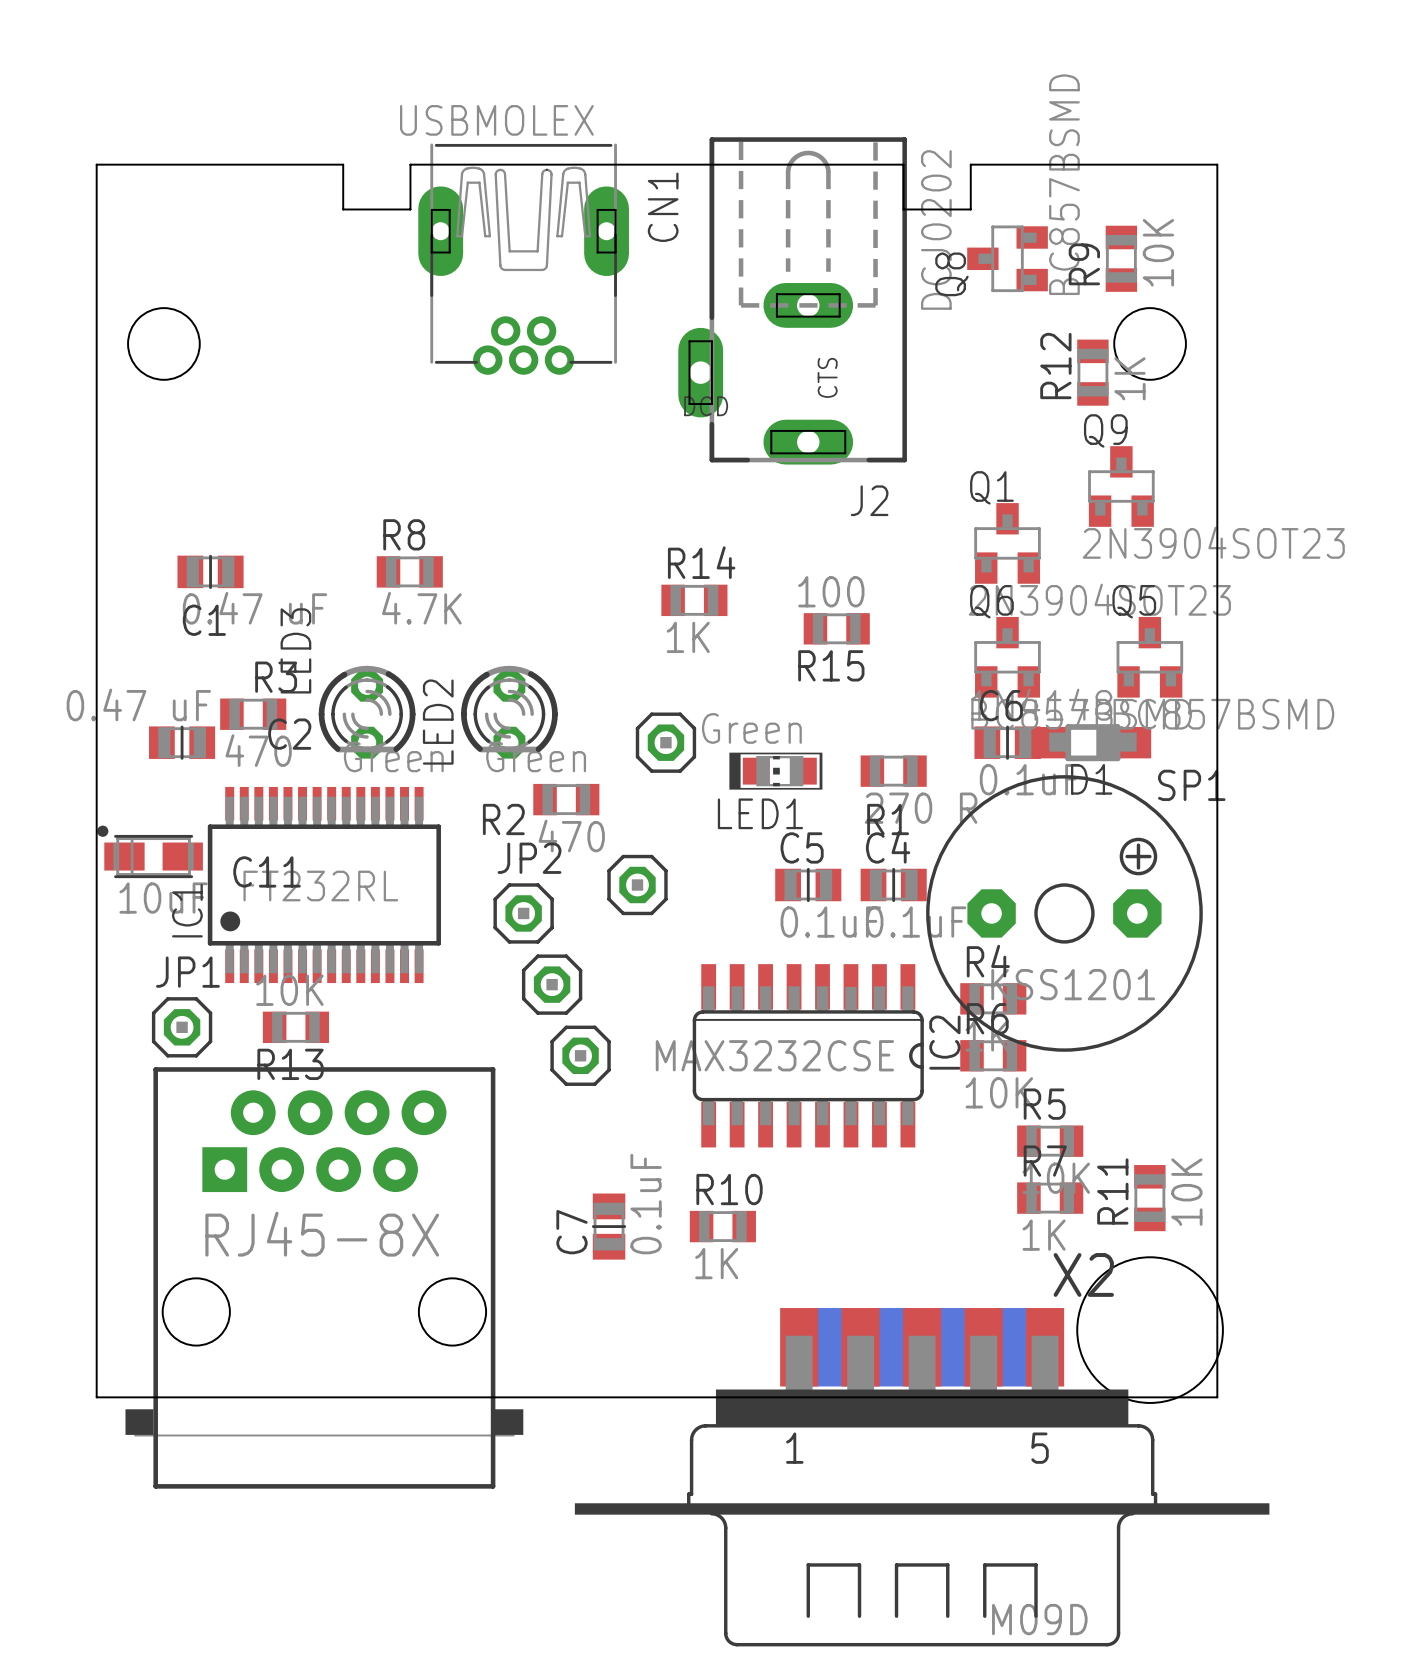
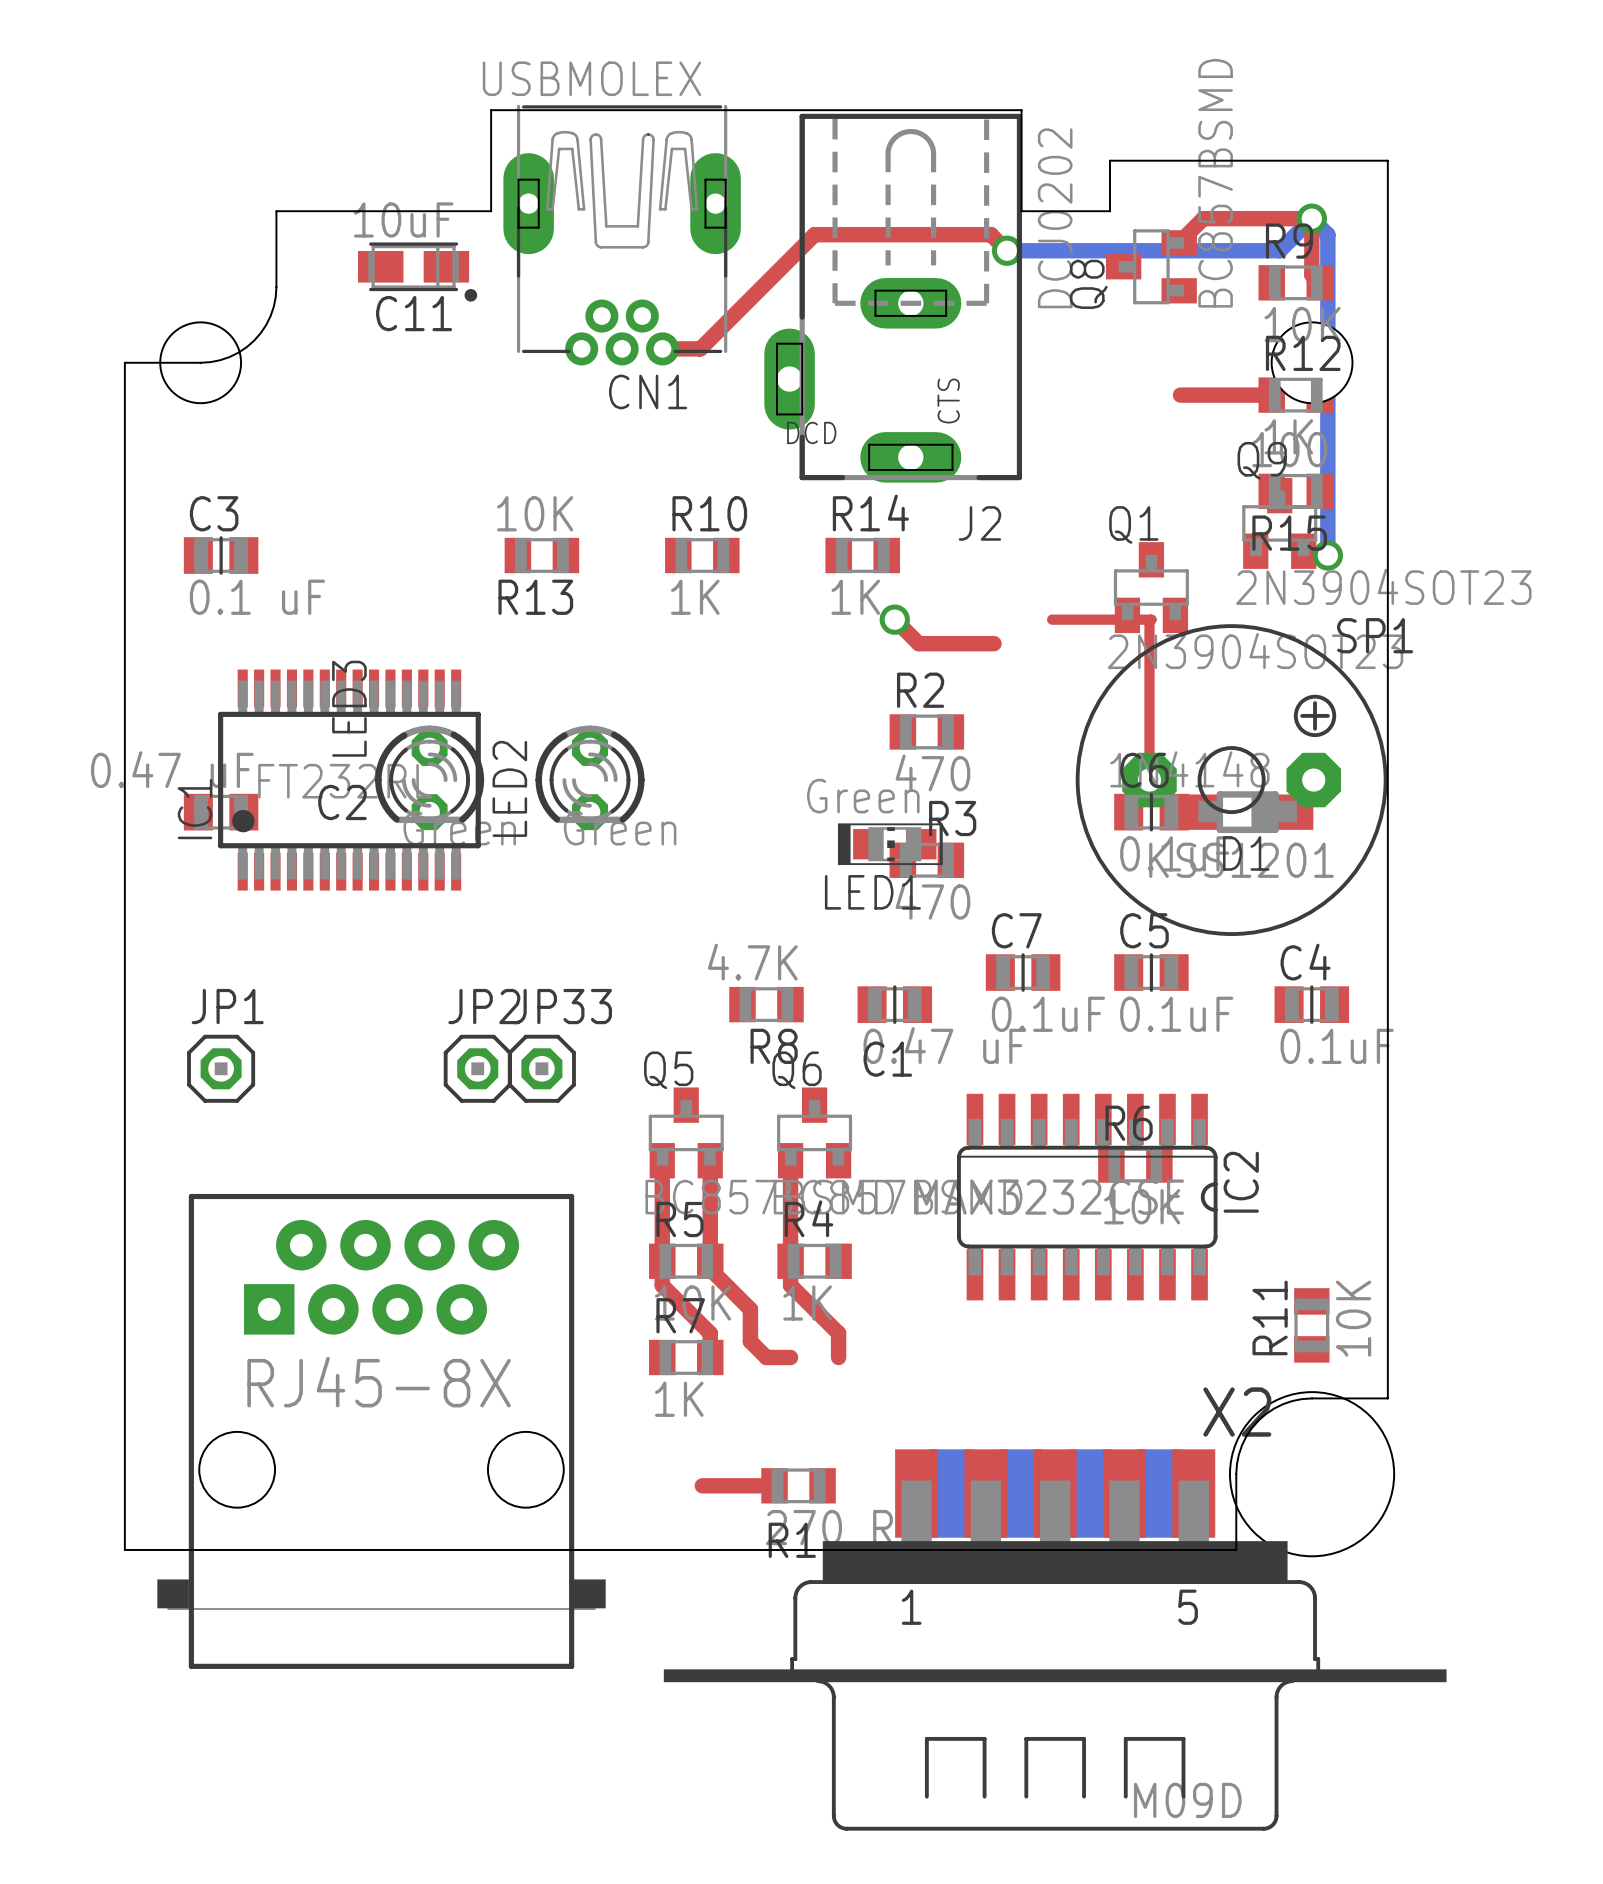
CN1 name rotation: 0° (663, 207) -> 90° clockwise (648, 391)
CN1 name position: CN1 (663, 207) -> CN1 (648, 391)
board edge: (343, 209) (343, 164) (96, 164) (96, 343) -> (402, 211) (276, 211) (275, 296) (266, 324) (254, 340) (238, 352) (210, 362) (124, 362)
board edge: (410, 209) (410, 164) (903, 164) (903, 209) -> (478, 211) (491, 211) (491, 110) (1021, 110) (1021, 211) (1034, 211)
via: none -> (1311, 218)
top track: none -> (1179, 242) (1203, 218) (1311, 218) (1311, 274) (1319, 282)
top track: none -> (1007, 250) (991, 234) (814, 234) (700, 348) (662, 348)
bottom track: none -> (1007, 250) (1279, 250) (1311, 218) (1327, 234) (1327, 555)
via: none -> (1007, 250)
R9 rotation: 0° (1121, 258) -> 90° clockwise (1295, 282)
CN1 position: (523, 259) -> (622, 235)
J2 position: (792, 300) -> (893, 298)
top track: none -> (1180, 395) (1271, 395)
R12 rotation: 0° (1092, 372) -> 90° clockwise (1295, 395)
R12 position: (1092, 372) -> (1295, 395)
C3: none -> 0.1 uF (221, 555)
via: none -> (1327, 555)
R8 name position: R8 (404, 534) -> R8 (774, 1046)
C1 position: (210, 571) -> (894, 1004)
R8 position: (409, 571) -> (766, 1004)
top track: none -> (894, 619) (918, 643) (994, 643)
via: none -> (894, 619)
top track: none -> (1052, 619) (1151, 619) (1149, 621) (1149, 780)
R14 position: (694, 600) -> (862, 555)
R8 value position: 4.7K (421, 608) -> 4.7K (752, 962)
R15 position: (836, 628) -> (1295, 491)
Q6 position: (1007, 657) -> (814, 1132)
Q5 position: (1149, 657) -> (686, 1132)
R3 position: (253, 714) -> (926, 860)
part: (665, 742) -> none
R1 position: (893, 771) -> (798, 1485)
R2 position: (566, 799) -> (926, 731)
R2 name position: R2 (503, 819) -> R2 (920, 690)
C4 name: C4 (888, 847) -> C7 (1016, 930)
C11 rotation: 0° (150, 851) -> 180° (417, 272)
C11 position: (150, 851) -> (417, 272)
C11 name position: C11 (267, 871) -> C11 (414, 313)
IC1 position: (324, 885) -> (349, 780)
part: (637, 885) -> none
C5 position: (808, 885) -> (1151, 972)
JP2 position: (523, 913) -> (477, 1068)
SP1 position: (1064, 913) -> (1231, 780)
C4: none -> 0.1uF (1311, 1004)
JP33: none -> (541, 1068)
part: (552, 984) -> none
R4 position: (993, 998) -> (814, 1261)
JP1 position: (182, 1027) -> (221, 1068)
R13 position: (295, 1027) -> (541, 555)
top track: none -> (662, 1160) (662, 1285) (710, 1333) (710, 1357)
top track: none -> (710, 1160) (710, 1269) (750, 1309) (750, 1341) (766, 1357) (790, 1357)
top track: none -> (790, 1160) (790, 1285) (838, 1333) (838, 1357)
part: (580, 1055) -> none
IC2 position: (808, 1055) -> (1087, 1197)
R5 position: (1050, 1141) -> (686, 1261)
R7 position: (1050, 1198) -> (686, 1357)
C7: 0.1uF (609, 1226) -> none
R10 position: (722, 1226) -> (702, 555)
board edge: (1217, 1262) (1217, 1397) (1082, 1397) -> (1387, 1398) (1302, 1399) (1274, 1408) (1258, 1420) (1246, 1436) (1236, 1464) (1236, 1549)
part position: (324, 1277) -> (381, 1431)
top track: none -> (702, 1485) (774, 1485)

